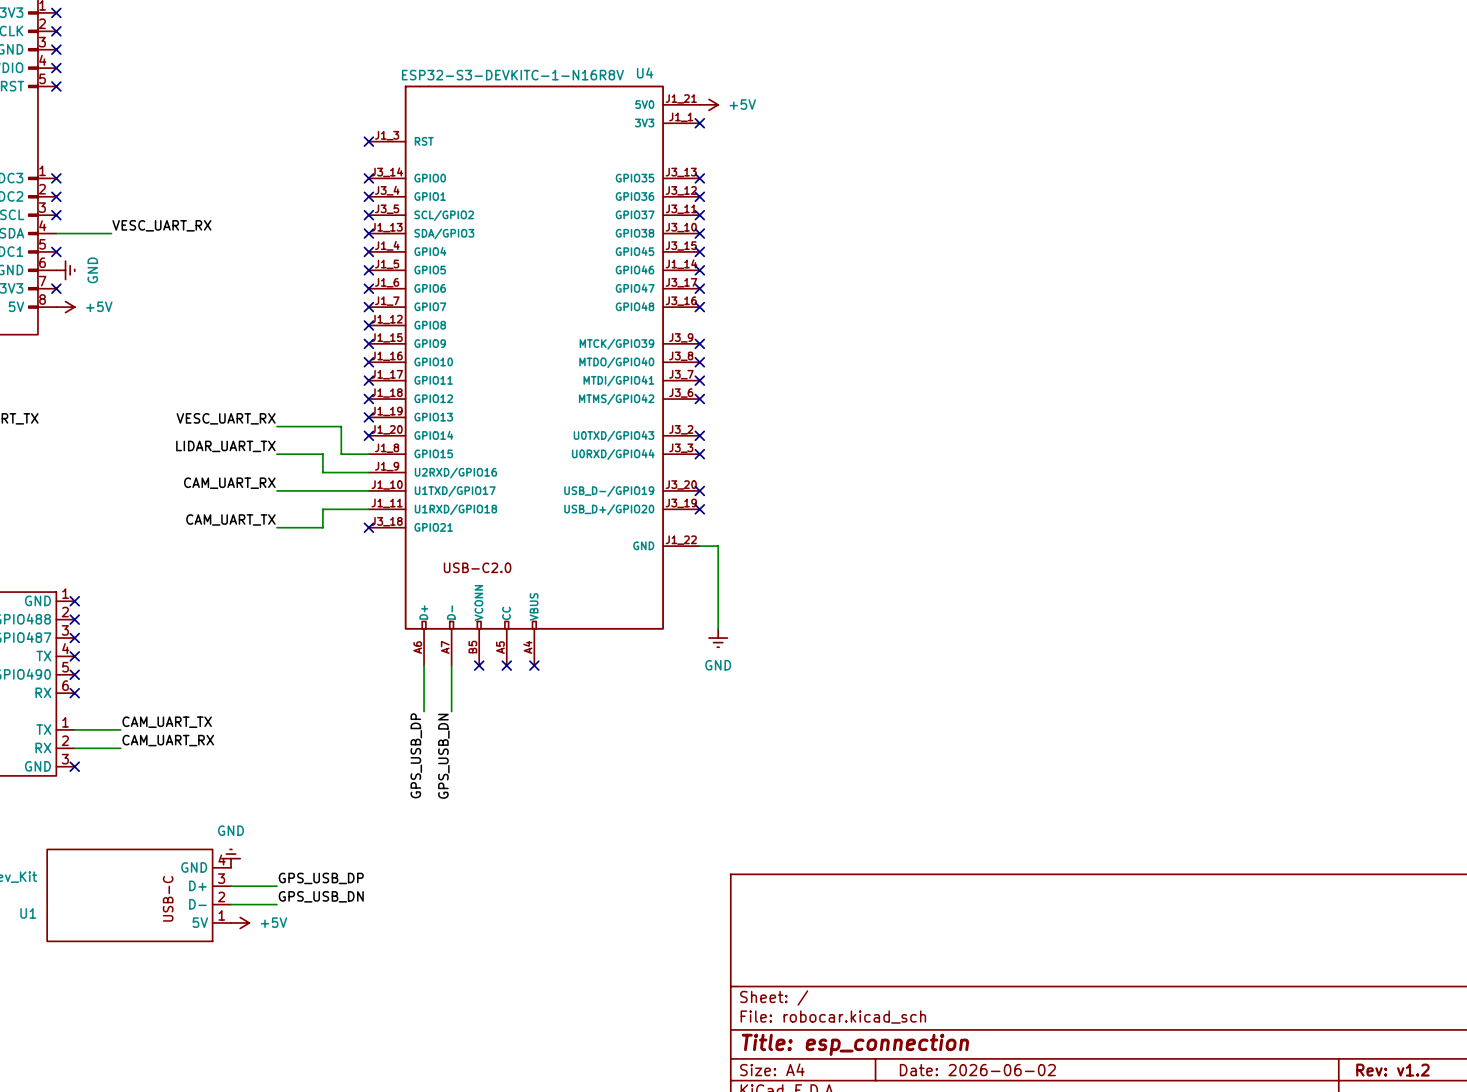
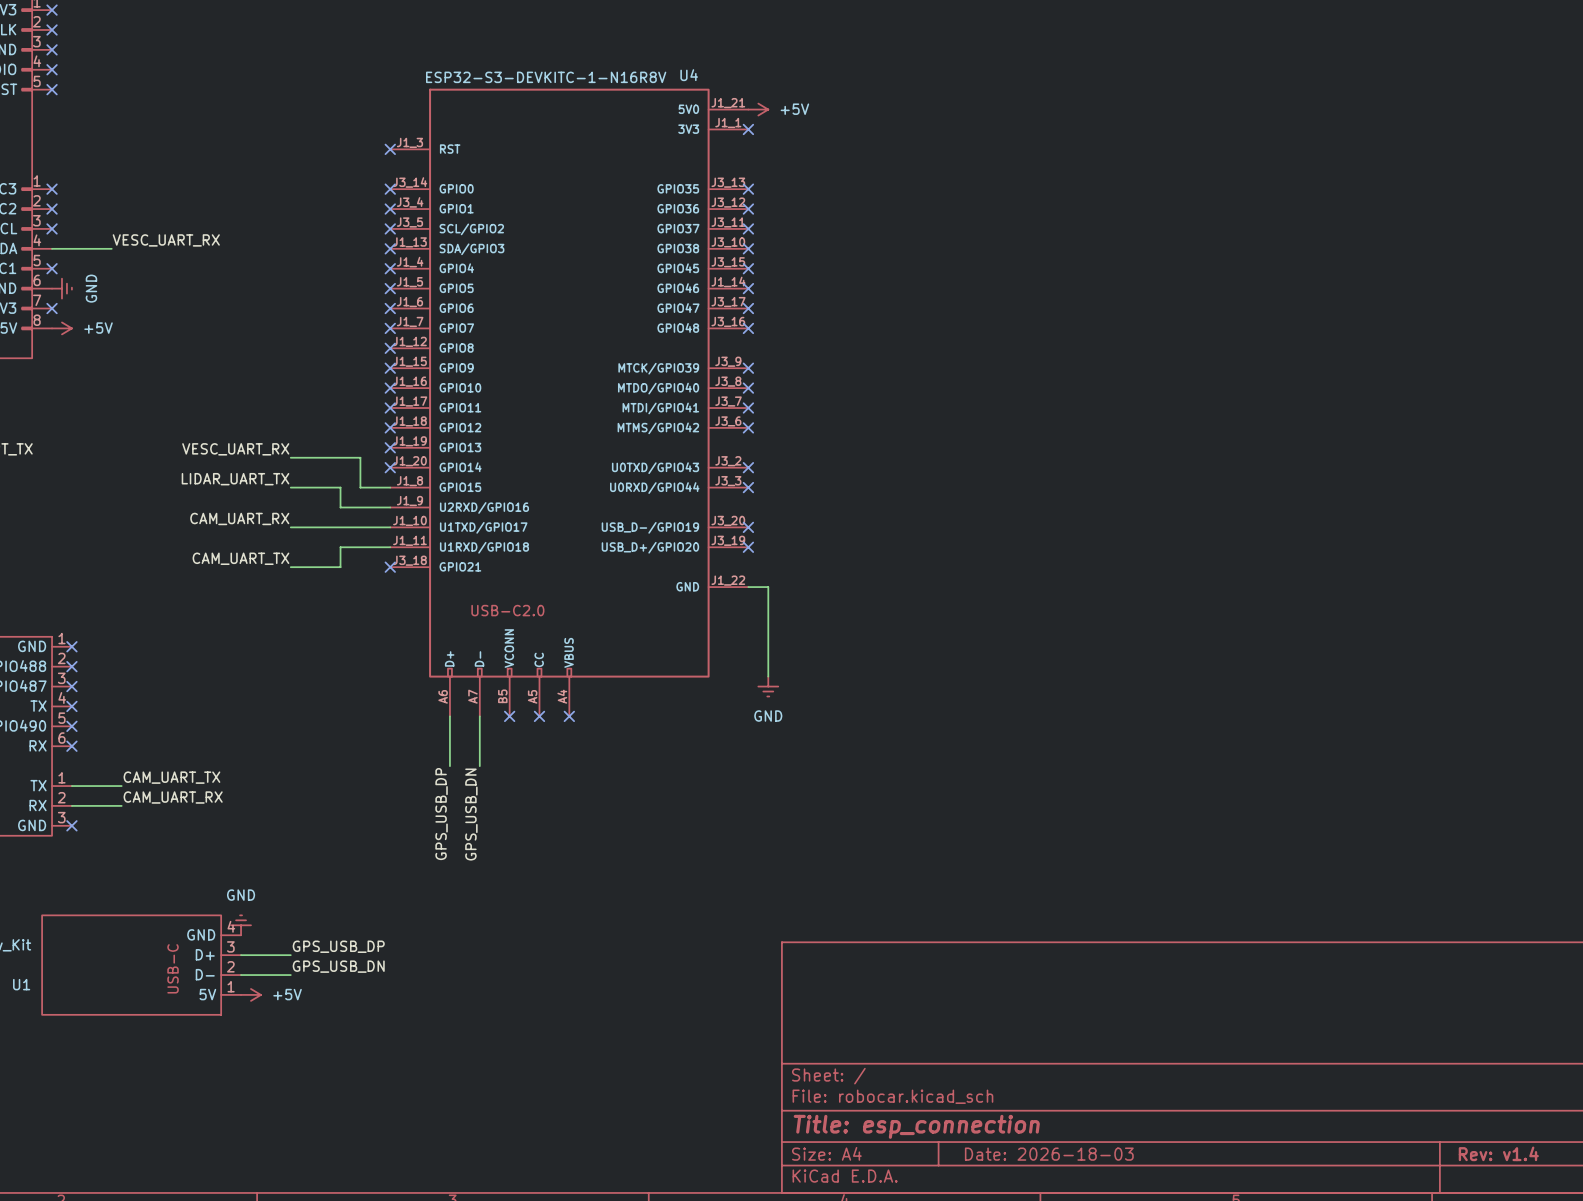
title block: Date: 2026-06-02 (977, 1070) -> Date: 2026-18-03 (1049, 1154)
title block: Rev: v1.2 (1392, 1070) -> Rev: v1.4 (1498, 1153)

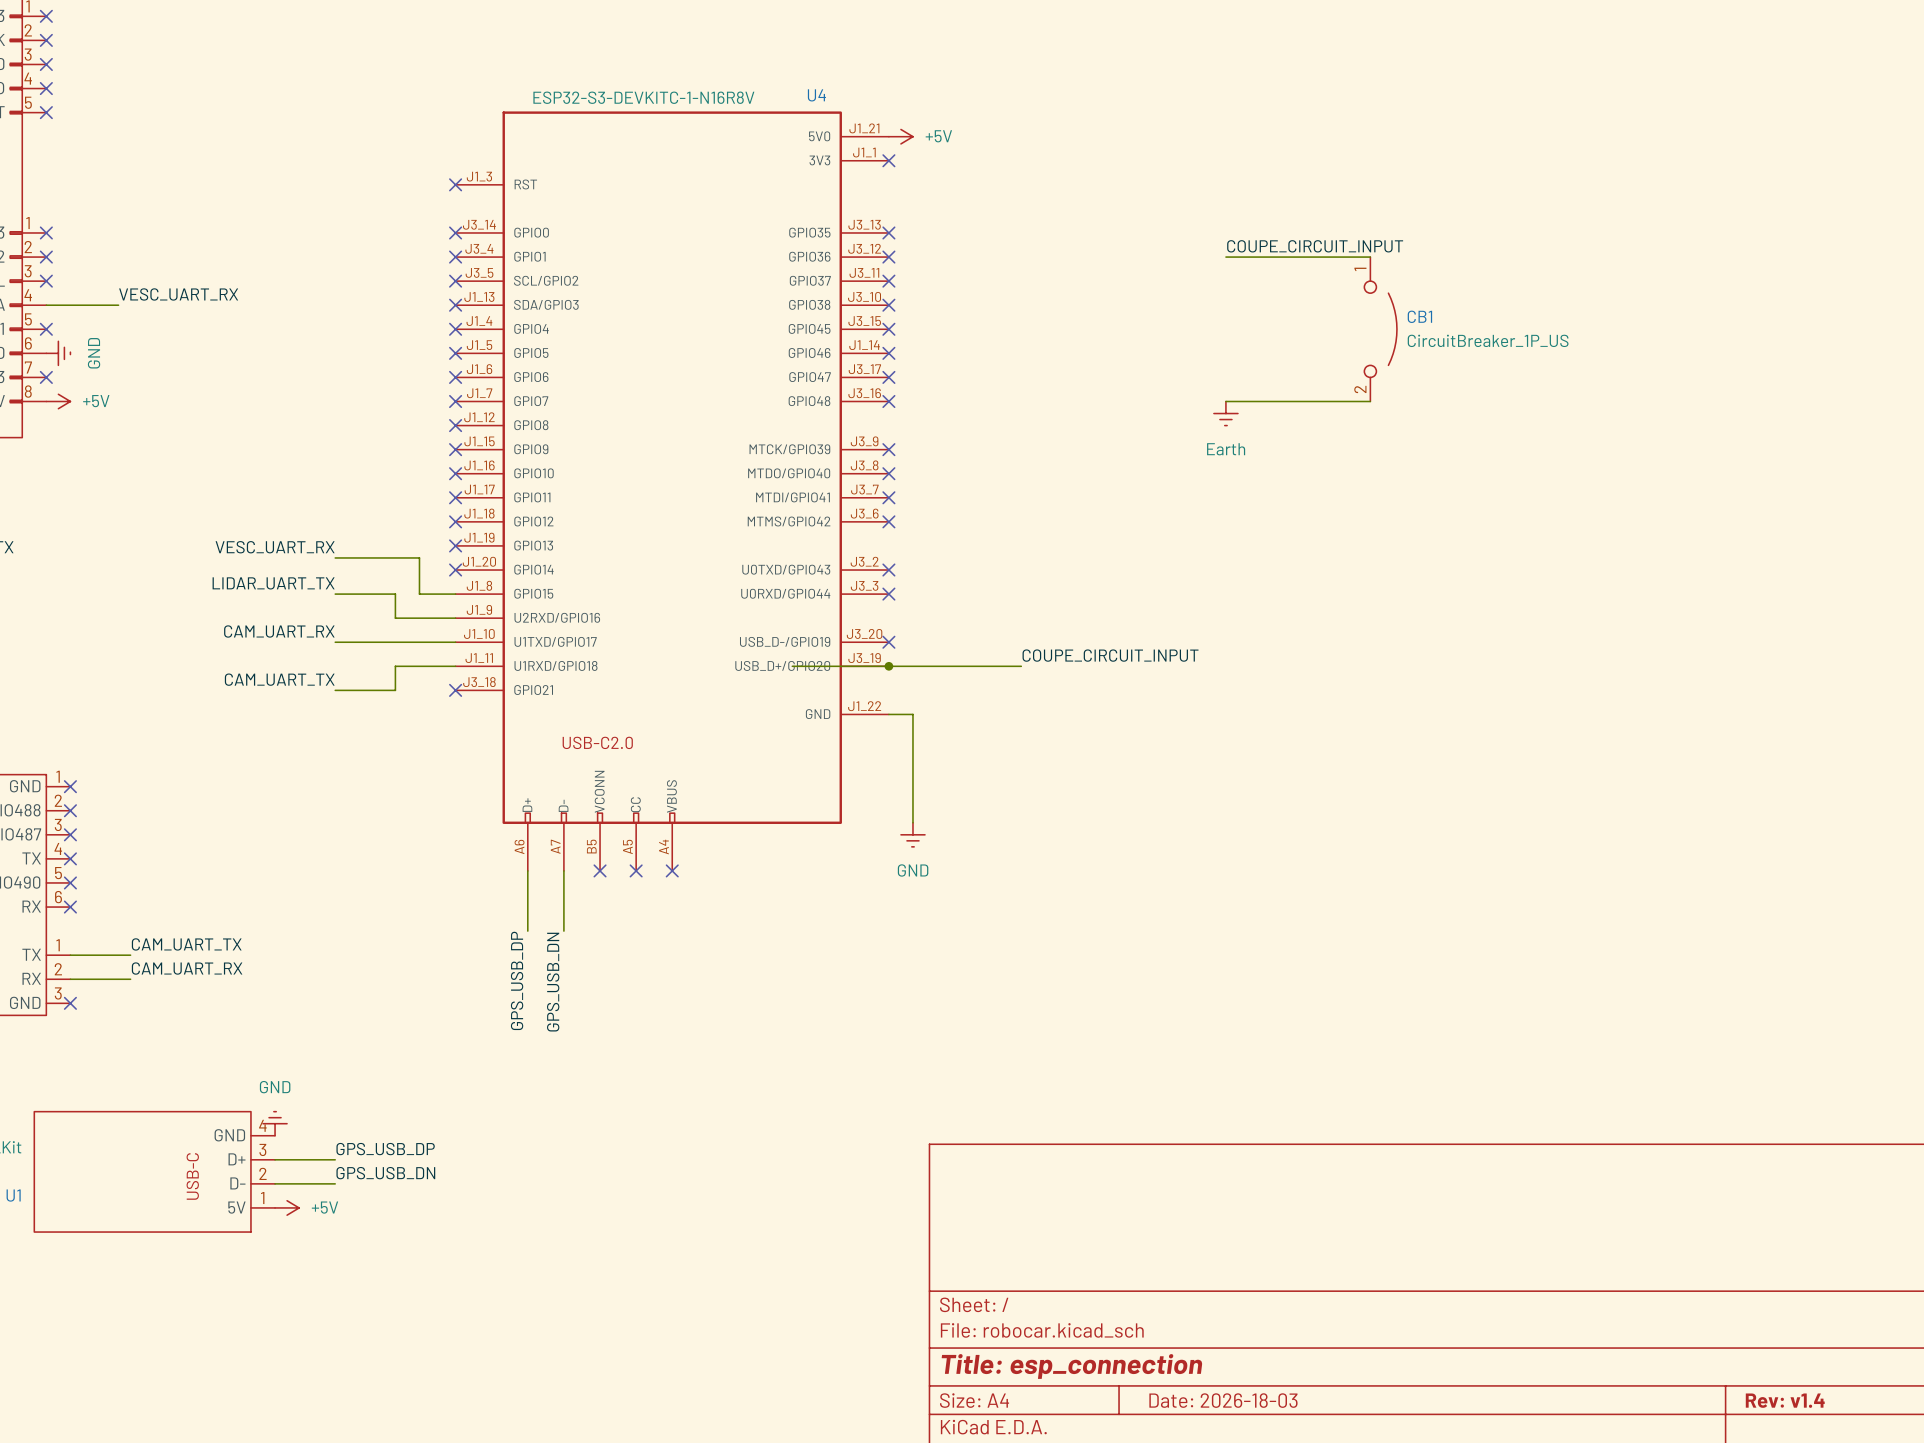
label: none -> COUPE_CIRCUIT_INPUT (1315, 246)
wire: none -> (1225, 257) (1370, 257)
CB1: none -> CircuitBreaker_1P_US (1380, 329)
wire: none -> (1225, 401) (1370, 401)
power symbol: none -> Earth (1225, 413)
label: none -> COUPE_CIRCUIT_INPUT (1110, 655)
wire: none -> (792, 666) (1021, 666)
no-connect mark: (748, 547) -> none
junction: none -> (888, 666)

